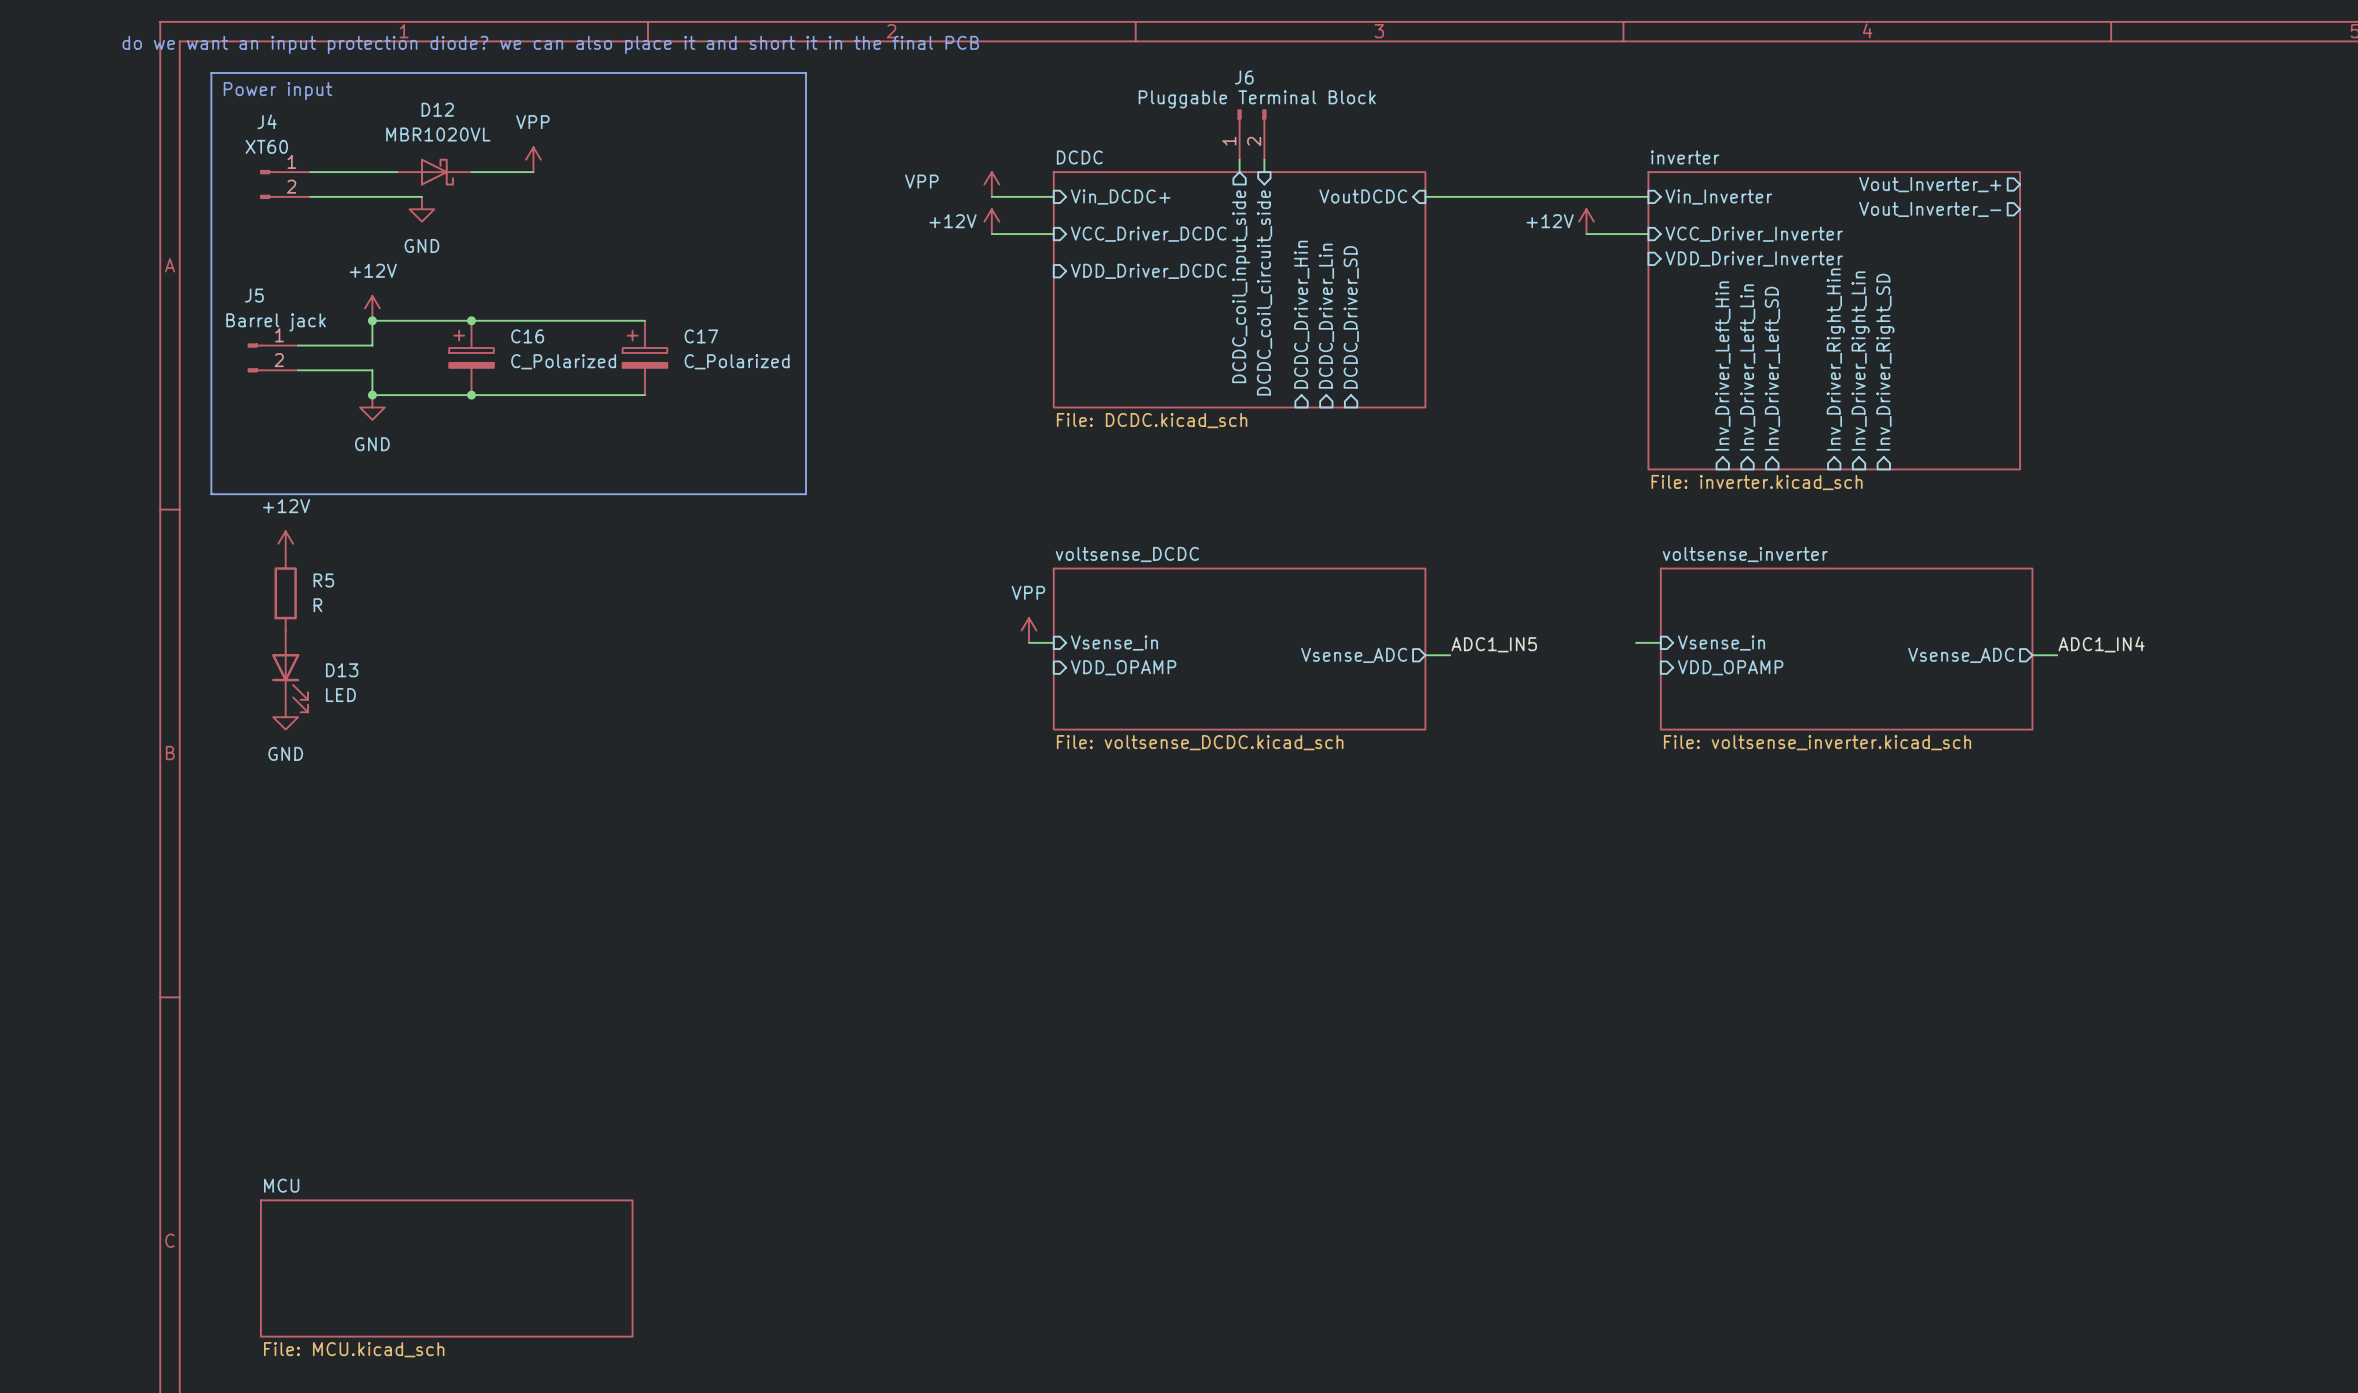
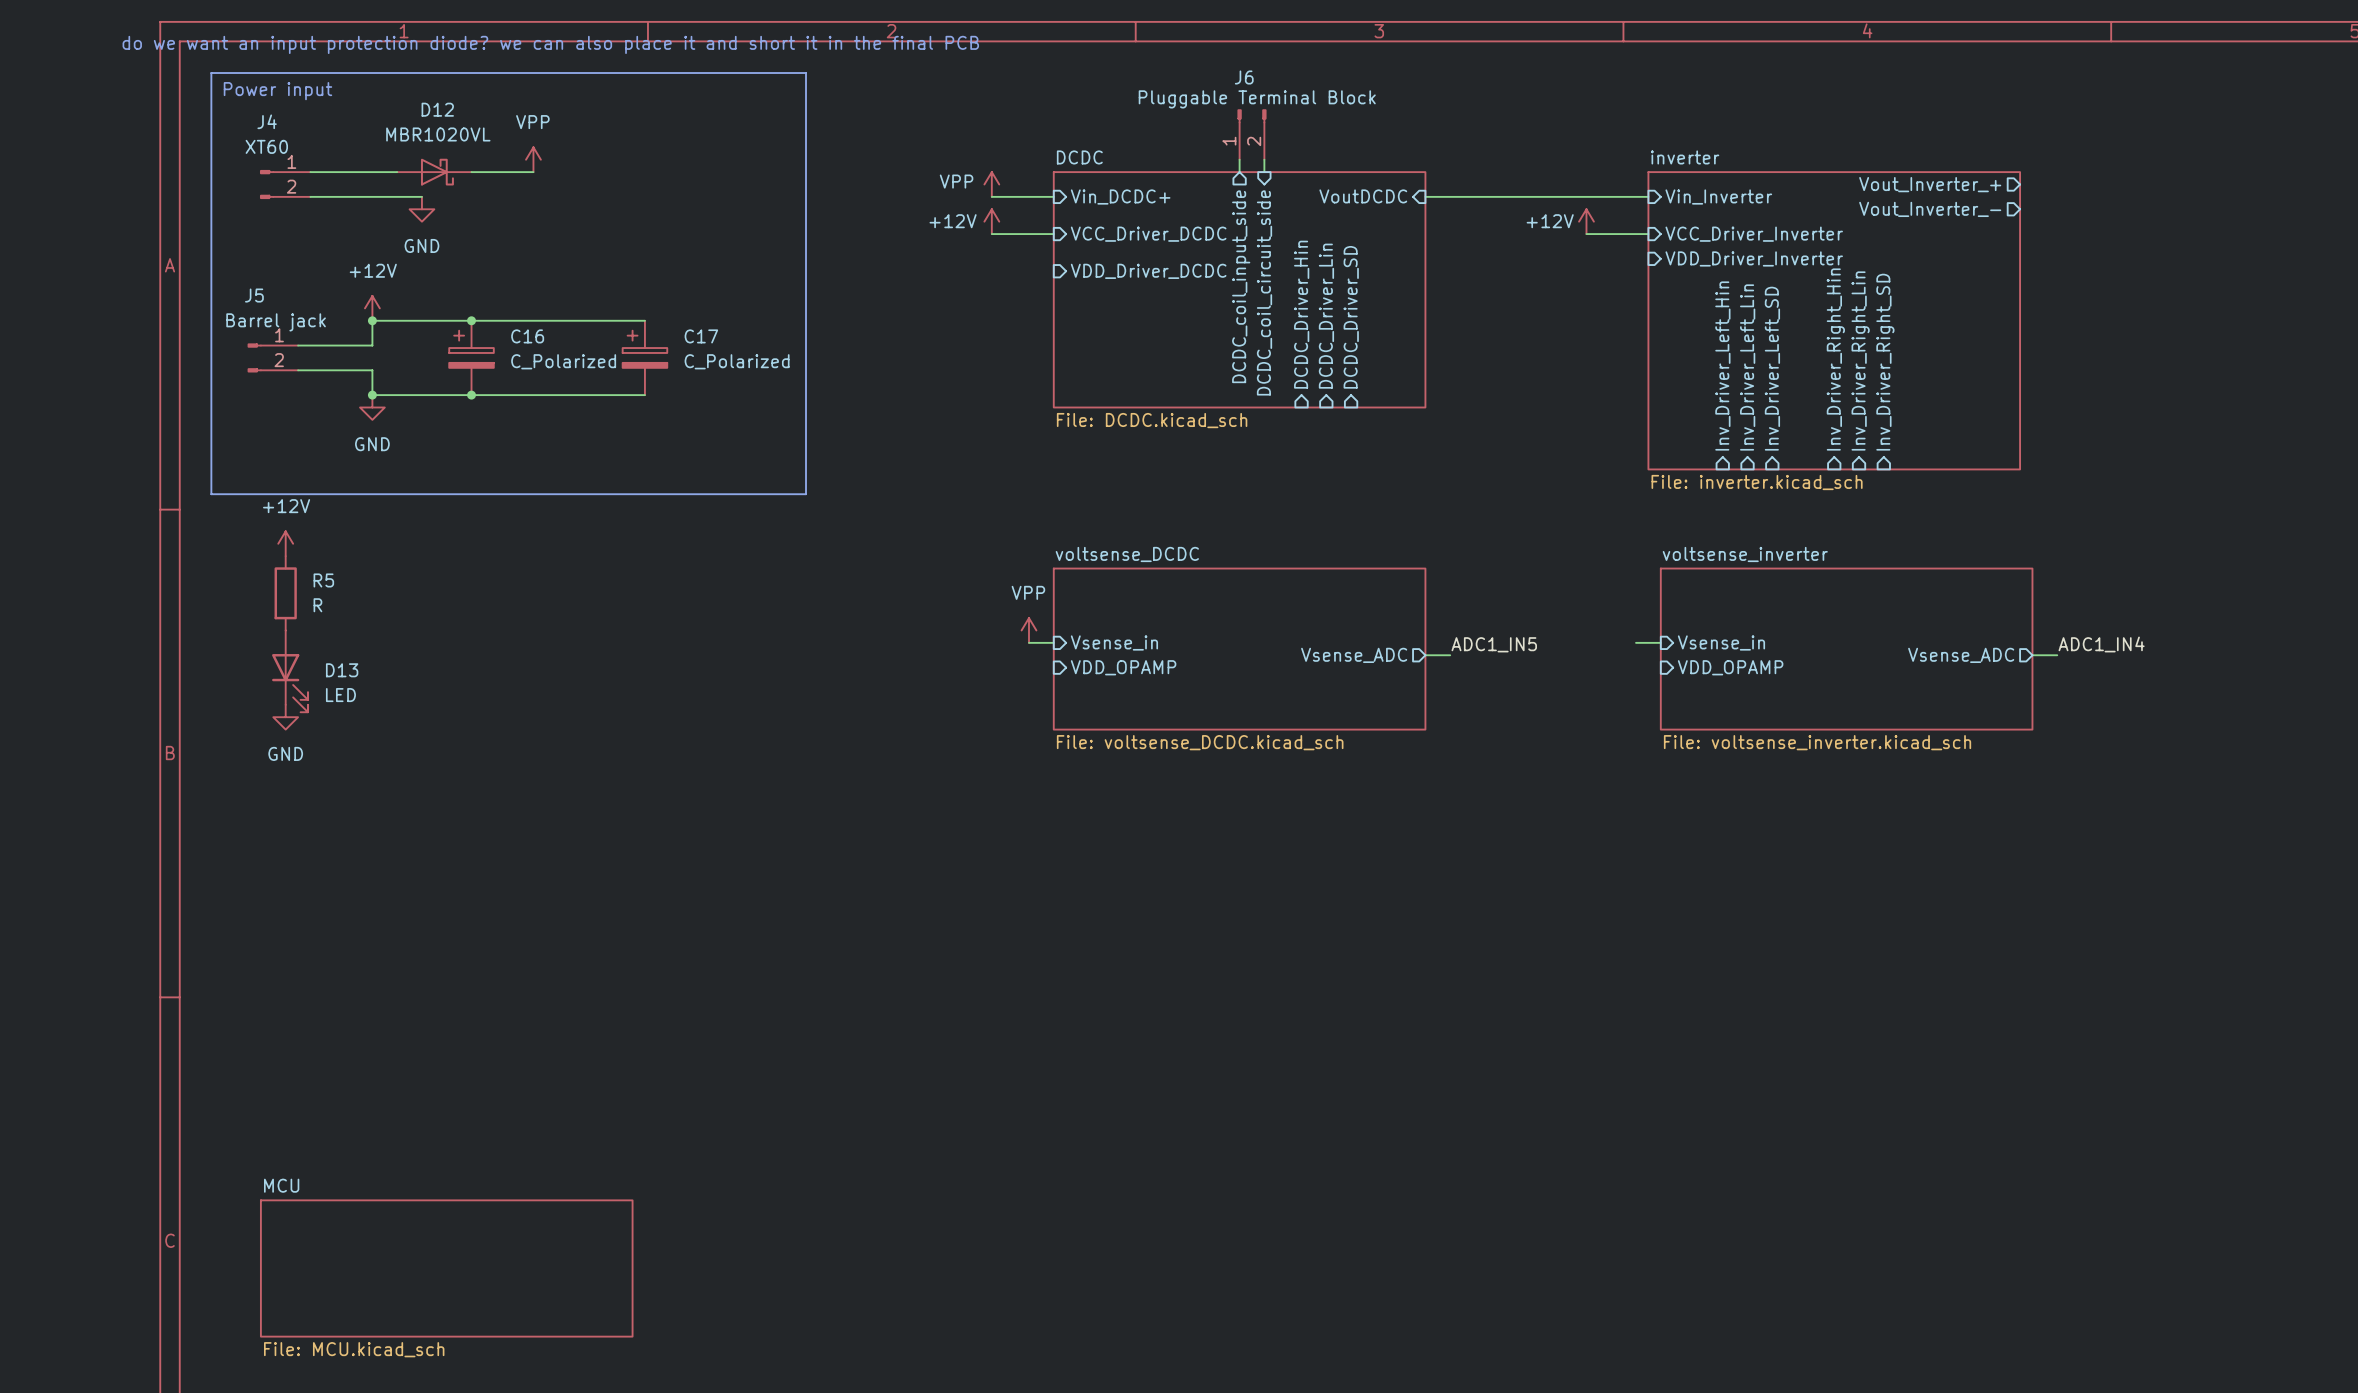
power symbol text position: VPP (921, 181) -> VPP (956, 181)

